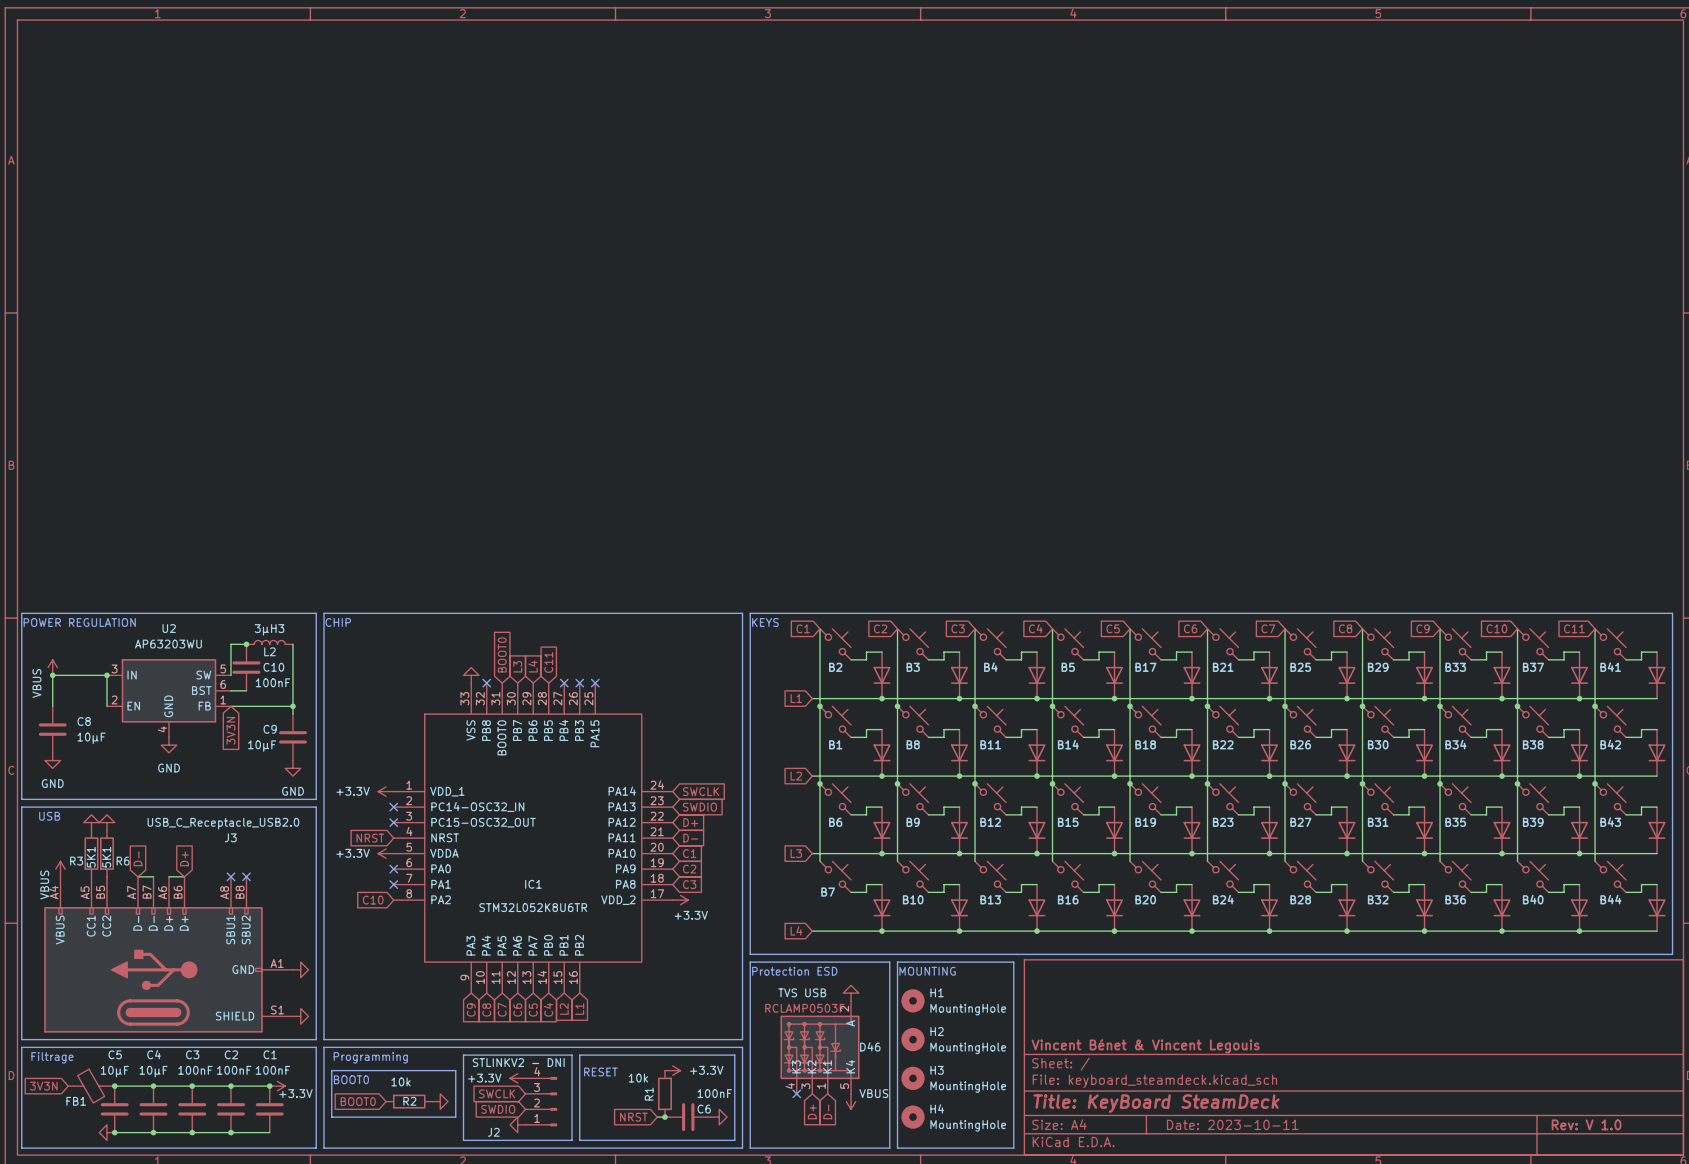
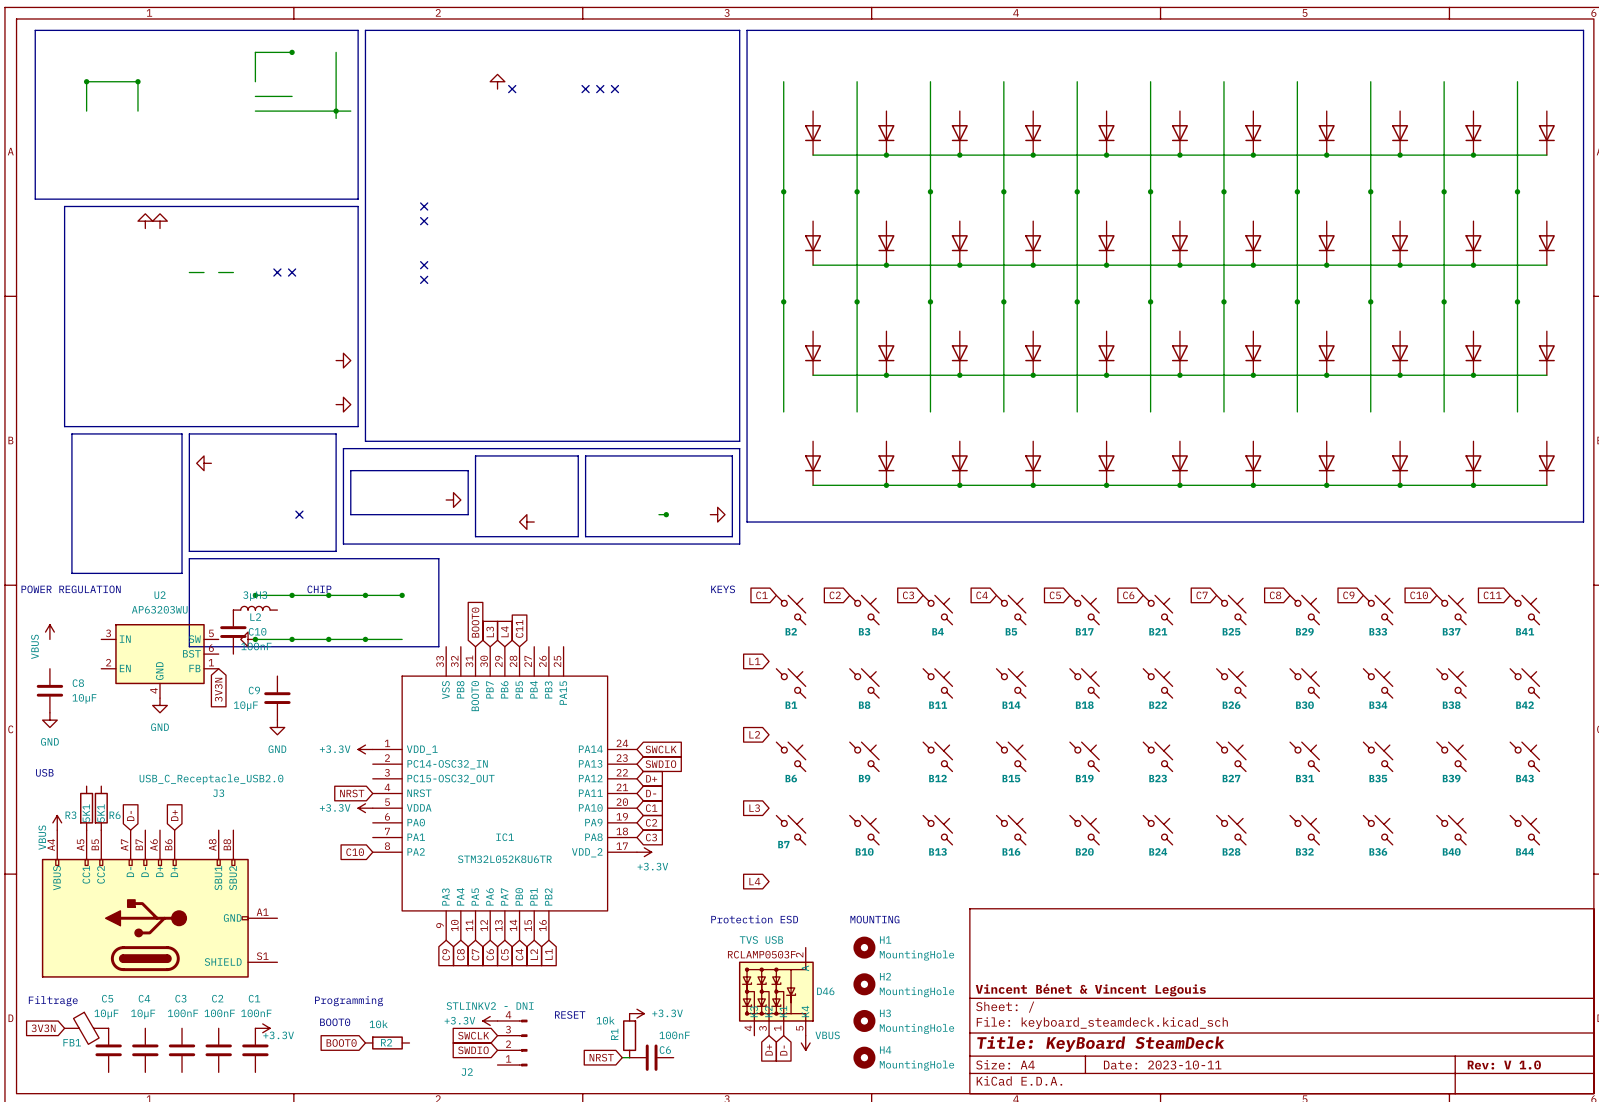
line: none -> (35, 30) (358, 30) (358, 199) (35, 199) (35, 30)
line: none -> (365, 30) (739, 30) (739, 441) (365, 441) (365, 30)
line: none -> (747, 30) (1583, 30) (1583, 522) (747, 522) (747, 30)
wire: none -> (292, 52) (255, 52) (255, 81)
junction: none -> (292, 52)
wire: none -> (336, 52) (336, 118)
junction: none -> (86, 81)
junction: none -> (137, 81)
power symbol: none -> (497, 81)
wire: none -> (783, 81) (783, 411)
wire: none -> (857, 81) (857, 411)
wire: none -> (930, 81) (930, 411)
wire: none -> (1003, 81) (1003, 411)
wire: none -> (1077, 81) (1077, 411)
wire: none -> (1150, 81) (1150, 411)
wire: none -> (1223, 81) (1223, 411)
wire: none -> (1297, 81) (1297, 411)
wire: none -> (1370, 81) (1370, 411)
wire: none -> (1444, 81) (1444, 411)
wire: none -> (1517, 81) (1517, 411)
no-connect mark: none -> (512, 89)
no-connect mark: none -> (585, 89)
no-connect mark: none -> (600, 89)
no-connect mark: none -> (614, 89)
wire: none -> (255, 96) (292, 96)
wire: none -> (86, 111) (86, 81) (137, 81) (137, 111)
wire: none -> (255, 111) (350, 111)
junction: none -> (336, 111)
part: none -> (813, 133)
part: none -> (886, 133)
part: none -> (959, 133)
part: none -> (1033, 133)
part: none -> (1106, 133)
part: none -> (1179, 133)
part: none -> (1253, 133)
part: none -> (1326, 133)
part: none -> (1400, 133)
part: none -> (1473, 133)
part: none -> (1546, 133)
wire: none -> (813, 155) (1546, 155)
junction: none -> (886, 155)
junction: none -> (959, 155)
junction: none -> (1033, 155)
junction: none -> (1106, 155)
junction: none -> (1179, 155)
junction: none -> (1253, 155)
junction: none -> (1326, 155)
junction: none -> (1400, 155)
junction: none -> (1473, 155)
junction: none -> (783, 191)
junction: none -> (857, 191)
junction: none -> (930, 191)
junction: none -> (1003, 191)
junction: none -> (1077, 191)
junction: none -> (1150, 191)
junction: none -> (1223, 191)
junction: none -> (1297, 191)
junction: none -> (1370, 191)
junction: none -> (1444, 191)
junction: none -> (1517, 191)
line: none -> (64, 206) (358, 206) (358, 426) (64, 426) (64, 206)
no-connect mark: none -> (424, 206)
power symbol: none -> (145, 221)
power symbol: none -> (159, 221)
no-connect mark: none -> (424, 221)
part: none -> (813, 243)
part: none -> (886, 243)
part: none -> (959, 243)
part: none -> (1033, 243)
part: none -> (1106, 243)
part: none -> (1179, 243)
part: none -> (1253, 243)
part: none -> (1326, 243)
part: none -> (1400, 243)
part: none -> (1473, 243)
part: none -> (1546, 243)
no-connect mark: none -> (424, 265)
wire: none -> (813, 265) (1546, 265)
junction: none -> (886, 265)
junction: none -> (959, 265)
junction: none -> (1033, 265)
junction: none -> (1106, 265)
junction: none -> (1179, 265)
junction: none -> (1253, 265)
junction: none -> (1326, 265)
junction: none -> (1400, 265)
junction: none -> (1473, 265)
wire: none -> (189, 272) (204, 272)
wire: none -> (218, 272) (233, 272)
no-connect mark: none -> (277, 272)
no-connect mark: none -> (292, 272)
no-connect mark: none -> (424, 279)
junction: none -> (783, 301)
junction: none -> (857, 301)
junction: none -> (930, 301)
junction: none -> (1003, 301)
junction: none -> (1077, 301)
junction: none -> (1150, 301)
junction: none -> (1223, 301)
junction: none -> (1297, 301)
junction: none -> (1370, 301)
junction: none -> (1444, 301)
junction: none -> (1517, 301)
part: none -> (813, 353)
part: none -> (886, 353)
part: none -> (959, 353)
part: none -> (1033, 353)
part: none -> (1106, 353)
part: none -> (1179, 353)
part: none -> (1253, 353)
part: none -> (1326, 353)
part: none -> (1400, 353)
part: none -> (1473, 353)
part: none -> (1546, 353)
power symbol: none -> (343, 360)
wire: none -> (813, 375) (1546, 375)
junction: none -> (886, 375)
junction: none -> (959, 375)
junction: none -> (1033, 375)
junction: none -> (1106, 375)
junction: none -> (1179, 375)
junction: none -> (1253, 375)
junction: none -> (1326, 375)
junction: none -> (1400, 375)
junction: none -> (1473, 375)
power symbol: none -> (343, 404)
line: none -> (71, 433) (182, 433) (182, 573) (71, 573) (71, 433)
line: none -> (189, 433) (189, 551) (336, 551) (336, 433) (189, 433)
line: none -> (343, 448) (739, 448) (739, 544) (343, 544) (343, 448)
line: none -> (475, 455) (578, 455) (578, 536) (475, 536) (475, 455)
line: none -> (585, 455) (732, 455) (732, 536) (585, 536) (585, 455)
power symbol: none -> (204, 463)
part: none -> (813, 463)
part: none -> (886, 463)
part: none -> (959, 463)
part: none -> (1033, 463)
part: none -> (1106, 463)
part: none -> (1179, 463)
part: none -> (1253, 463)
part: none -> (1326, 463)
part: none -> (1400, 463)
part: none -> (1473, 463)
part: none -> (1546, 463)
line: none -> (350, 470) (468, 470) (468, 514) (350, 514) (350, 470)
wire: none -> (813, 485) (1546, 485)
junction: none -> (886, 485)
junction: none -> (959, 485)
junction: none -> (1033, 485)
junction: none -> (1106, 485)
junction: none -> (1179, 485)
junction: none -> (1253, 485)
junction: none -> (1326, 485)
junction: none -> (1400, 485)
junction: none -> (1473, 485)
power symbol: none -> (453, 499)
no-connect mark: none -> (299, 514)
wire: none -> (658, 514) (666, 514)
junction: none -> (666, 514)
power symbol: none -> (717, 514)
power symbol: none -> (526, 522)
line: none -> (189, 558) (438, 558) (438, 646) (189, 646) (189, 558)
line: (21, 613) (316, 613) (316, 799) (21, 799) (21, 613) -> none
line: (323, 613) (742, 613) (742, 1039) (323, 1039) (323, 613) -> none
line: (750, 613) (1672, 613) (1672, 954) (750, 954) (750, 613) -> none
wire: none -> (255, 595) (402, 595)
junction: none -> (255, 595)
junction: none -> (292, 595)
junction: none -> (328, 595)
junction: none -> (365, 595)
junction: none -> (402, 595)
wire: (820, 628) (820, 861) -> none
wire: (897, 628) (897, 861) -> none
wire: (975, 628) (975, 861) -> none
wire: (1052, 628) (1052, 861) -> none
wire: (1130, 628) (1130, 861) -> none
wire: (1207, 628) (1207, 861) -> none
wire: (1285, 628) (1285, 861) -> none
wire: (1362, 628) (1362, 861) -> none
wire: (1440, 628) (1440, 861) -> none
wire: (1517, 628) (1517, 861) -> none
wire: (1595, 628) (1595, 861) -> none
wire: (246, 644) (230, 644) (230, 675) -> none
junction: (246, 644) -> none
wire: (292, 644) (292, 714) -> none
wire: (882, 652) (866, 652) (866, 659) (851, 659) -> none
wire: (959, 652) (944, 652) (944, 659) (928, 659) -> none
wire: (1037, 652) (1021, 652) (1021, 659) (1006, 659) -> none
wire: (1114, 652) (1099, 652) (1099, 659) (1083, 659) -> none
wire: (1192, 652) (1176, 652) (1176, 659) (1161, 659) -> none
wire: (1269, 652) (1254, 652) (1254, 659) (1238, 659) -> none
wire: (1347, 652) (1331, 652) (1331, 659) (1316, 659) -> none
wire: (1424, 652) (1409, 652) (1409, 659) (1393, 659) -> none
wire: (1502, 652) (1486, 652) (1486, 659) (1471, 659) -> none
wire: (1579, 652) (1564, 652) (1564, 659) (1548, 659) -> none
wire: (1657, 652) (1641, 652) (1641, 659) (1626, 659) -> none
junction: (52, 675) -> none
junction: (106, 675) -> none
power symbol: none -> (248, 639)
wire: none -> (255, 639) (402, 639)
junction: none -> (255, 639)
junction: none -> (292, 639)
junction: none -> (328, 639)
junction: none -> (365, 639)
power symbol: (471, 675) -> none
part: (882, 675) -> none
part: (959, 675) -> none
part: (1037, 675) -> none
part: (1114, 675) -> none
part: (1192, 675) -> none
part: (1269, 675) -> none
part: (1347, 675) -> none
part: (1424, 675) -> none
part: (1502, 675) -> none
part: (1579, 675) -> none
part: (1657, 675) -> none
no-connect mark: (486, 683) -> none
no-connect mark: (564, 683) -> none
no-connect mark: (579, 683) -> none
no-connect mark: (595, 683) -> none
wire: (230, 690) (246, 690) -> none
wire: (812, 698) (1657, 698) -> none
junction: (882, 698) -> none
junction: (959, 698) -> none
junction: (1037, 698) -> none
junction: (1114, 698) -> none
junction: (1192, 698) -> none
junction: (1269, 698) -> none
junction: (1347, 698) -> none
junction: (1424, 698) -> none
junction: (1502, 698) -> none
junction: (1579, 698) -> none
wire: (52, 706) (52, 675) (106, 675) (106, 706) -> none
wire: (230, 706) (292, 706) -> none
junction: (292, 706) -> none
junction: (820, 706) -> none
junction: (897, 706) -> none
junction: (975, 706) -> none
junction: (1052, 706) -> none
junction: (1130, 706) -> none
junction: (1207, 706) -> none
junction: (1285, 706) -> none
junction: (1362, 706) -> none
junction: (1440, 706) -> none
junction: (1517, 706) -> none
junction: (1595, 706) -> none
wire: (882, 729) (866, 729) (866, 737) (851, 737) -> none
wire: (959, 729) (944, 729) (944, 737) (928, 737) -> none
wire: (1037, 729) (1021, 729) (1021, 737) (1006, 737) -> none
wire: (1114, 729) (1099, 729) (1099, 737) (1083, 737) -> none
wire: (1192, 729) (1176, 729) (1176, 737) (1161, 737) -> none
wire: (1269, 729) (1254, 729) (1254, 737) (1238, 737) -> none
wire: (1347, 729) (1331, 729) (1331, 737) (1316, 737) -> none
wire: (1424, 729) (1409, 729) (1409, 737) (1393, 737) -> none
wire: (1502, 729) (1486, 729) (1486, 737) (1471, 737) -> none
wire: (1579, 729) (1564, 729) (1564, 737) (1548, 737) -> none
wire: (1657, 729) (1641, 729) (1641, 737) (1626, 737) -> none
part: (882, 752) -> none
part: (959, 752) -> none
part: (1037, 752) -> none
part: (1114, 752) -> none
part: (1192, 752) -> none
part: (1269, 752) -> none
part: (1347, 752) -> none
part: (1424, 752) -> none
part: (1502, 752) -> none
part: (1579, 752) -> none
part: (1657, 752) -> none
wire: (812, 776) (1657, 776) -> none
junction: (882, 776) -> none
junction: (959, 776) -> none
junction: (1037, 776) -> none
junction: (1114, 776) -> none
junction: (1192, 776) -> none
junction: (1269, 776) -> none
junction: (1347, 776) -> none
junction: (1424, 776) -> none
junction: (1502, 776) -> none
junction: (1579, 776) -> none
junction: (820, 783) -> none
junction: (897, 783) -> none
junction: (975, 783) -> none
junction: (1052, 783) -> none
junction: (1130, 783) -> none
junction: (1207, 783) -> none
junction: (1285, 783) -> none
junction: (1362, 783) -> none
junction: (1440, 783) -> none
junction: (1517, 783) -> none
junction: (1595, 783) -> none
line: (21, 807) (21, 1039) (316, 1039) (316, 807) (21, 807) -> none
no-connect mark: (393, 807) -> none
wire: (882, 807) (866, 807) (866, 814) (851, 814) -> none
wire: (959, 807) (944, 807) (944, 814) (928, 814) -> none
wire: (1037, 807) (1021, 807) (1021, 814) (1006, 814) -> none
wire: (1114, 807) (1099, 807) (1099, 814) (1083, 814) -> none
wire: (1192, 807) (1176, 807) (1176, 814) (1161, 814) -> none
wire: (1269, 807) (1254, 807) (1254, 814) (1238, 814) -> none
wire: (1347, 807) (1331, 807) (1331, 814) (1316, 814) -> none
wire: (1424, 807) (1409, 807) (1409, 814) (1393, 814) -> none
wire: (1502, 807) (1486, 807) (1486, 814) (1471, 814) -> none
wire: (1579, 807) (1564, 807) (1564, 814) (1548, 814) -> none
wire: (1657, 807) (1641, 807) (1641, 814) (1626, 814) -> none
power symbol: (91, 822) -> none
power symbol: (106, 822) -> none
no-connect mark: (393, 822) -> none
part: (882, 830) -> none
part: (959, 830) -> none
part: (1037, 830) -> none
part: (1114, 830) -> none
part: (1192, 830) -> none
part: (1269, 830) -> none
part: (1347, 830) -> none
part: (1424, 830) -> none
part: (1502, 830) -> none
part: (1579, 830) -> none
part: (1657, 830) -> none
wire: (812, 853) (1657, 853) -> none
junction: (882, 853) -> none
junction: (959, 853) -> none
junction: (1037, 853) -> none
junction: (1114, 853) -> none
junction: (1192, 853) -> none
junction: (1269, 853) -> none
junction: (1347, 853) -> none
junction: (1424, 853) -> none
junction: (1502, 853) -> none
junction: (1579, 853) -> none
no-connect mark: (393, 869) -> none
wire: (137, 876) (153, 876) -> none
wire: (168, 876) (184, 876) -> none
no-connect mark: (230, 876) -> none
no-connect mark: (246, 876) -> none
no-connect mark: (393, 884) -> none
wire: (882, 884) (866, 884) (866, 892) (851, 892) -> none
wire: (959, 884) (944, 884) (944, 892) (928, 892) -> none
wire: (1037, 884) (1021, 884) (1021, 892) (1006, 892) -> none
wire: (1114, 884) (1099, 884) (1099, 892) (1083, 892) -> none
wire: (1192, 884) (1176, 884) (1176, 892) (1161, 892) -> none
wire: (1269, 884) (1254, 884) (1254, 892) (1238, 892) -> none
wire: (1347, 884) (1331, 884) (1331, 892) (1316, 892) -> none
wire: (1424, 884) (1409, 884) (1409, 892) (1393, 892) -> none
wire: (1502, 884) (1486, 884) (1486, 892) (1471, 892) -> none
wire: (1579, 884) (1564, 884) (1564, 892) (1548, 892) -> none
wire: (1657, 884) (1641, 884) (1641, 892) (1626, 892) -> none
part: (882, 907) -> none
part: (959, 907) -> none
part: (1037, 907) -> none
part: (1114, 907) -> none
part: (1192, 907) -> none
part: (1269, 907) -> none
part: (1347, 907) -> none
part: (1424, 907) -> none
part: (1502, 907) -> none
part: (1579, 907) -> none
part: (1657, 907) -> none
wire: (812, 931) (1657, 931) -> none
junction: (882, 931) -> none
junction: (959, 931) -> none
junction: (1037, 931) -> none
junction: (1114, 931) -> none
junction: (1192, 931) -> none
junction: (1269, 931) -> none
junction: (1347, 931) -> none
junction: (1424, 931) -> none
junction: (1502, 931) -> none
junction: (1579, 931) -> none
line: (750, 962) (750, 1148) (889, 1148) (889, 962) (750, 962) -> none
line: (897, 962) (1013, 962) (1013, 1148) (897, 1148) (897, 962) -> none
power symbol: (300, 969) -> none
power symbol: (851, 993) -> none
power symbol: (300, 1016) -> none
line: (21, 1047) (316, 1047) (316, 1148) (21, 1148) (21, 1047) -> none
line: (323, 1047) (323, 1148) (742, 1148) (742, 1047) (323, 1047) -> none
line: (463, 1055) (572, 1055) (572, 1140) (463, 1140) (463, 1055) -> none
line: (579, 1055) (734, 1055) (734, 1140) (579, 1140) (579, 1055) -> none
line: (331, 1070) (455, 1070) (455, 1117) (331, 1117) (331, 1070) -> none
wire: (114, 1086) (269, 1086) -> none
junction: (114, 1086) -> none
junction: (153, 1086) -> none
junction: (192, 1086) -> none
junction: (230, 1086) -> none
junction: (269, 1086) -> none
no-connect mark: (796, 1093) -> none
power symbol: (440, 1101) -> none
junction: (665, 1117) -> none
power symbol: (719, 1117) -> none
power symbol: (517, 1124) -> none
power symbol: (106, 1132) -> none
wire: (114, 1132) (269, 1132) -> none
junction: (114, 1132) -> none
junction: (153, 1132) -> none
junction: (192, 1132) -> none
junction: (230, 1132) -> none

